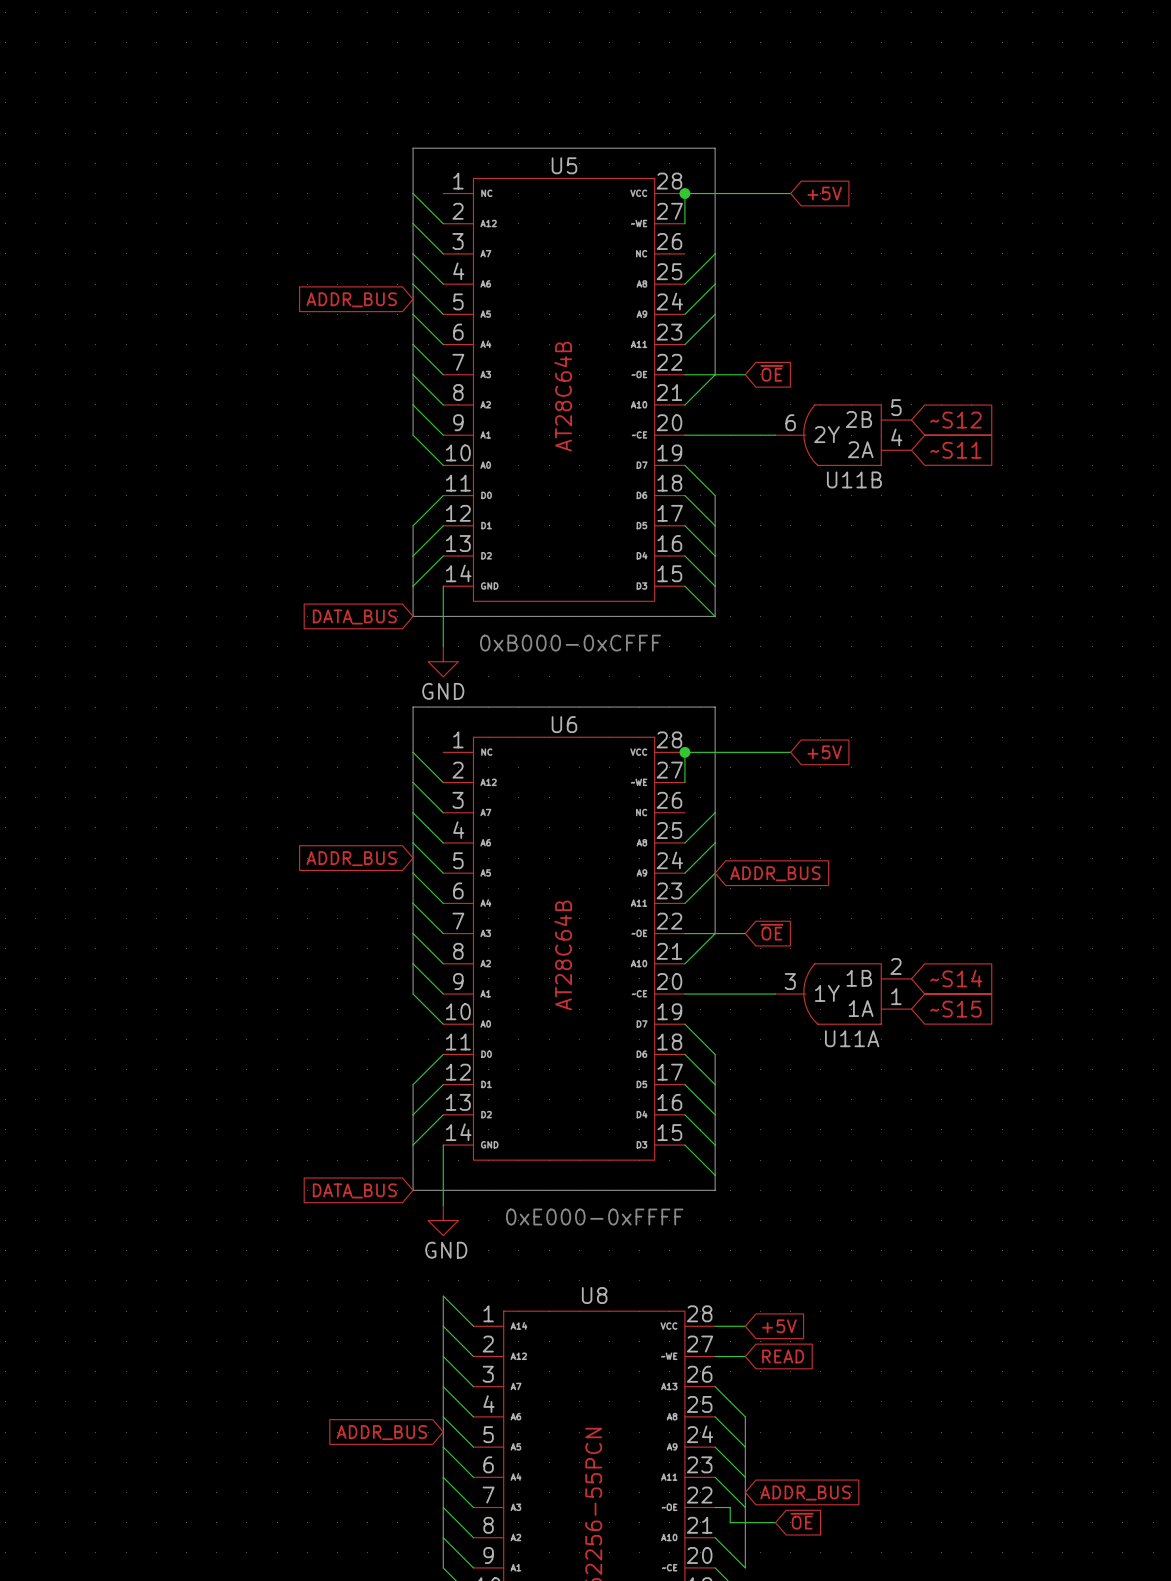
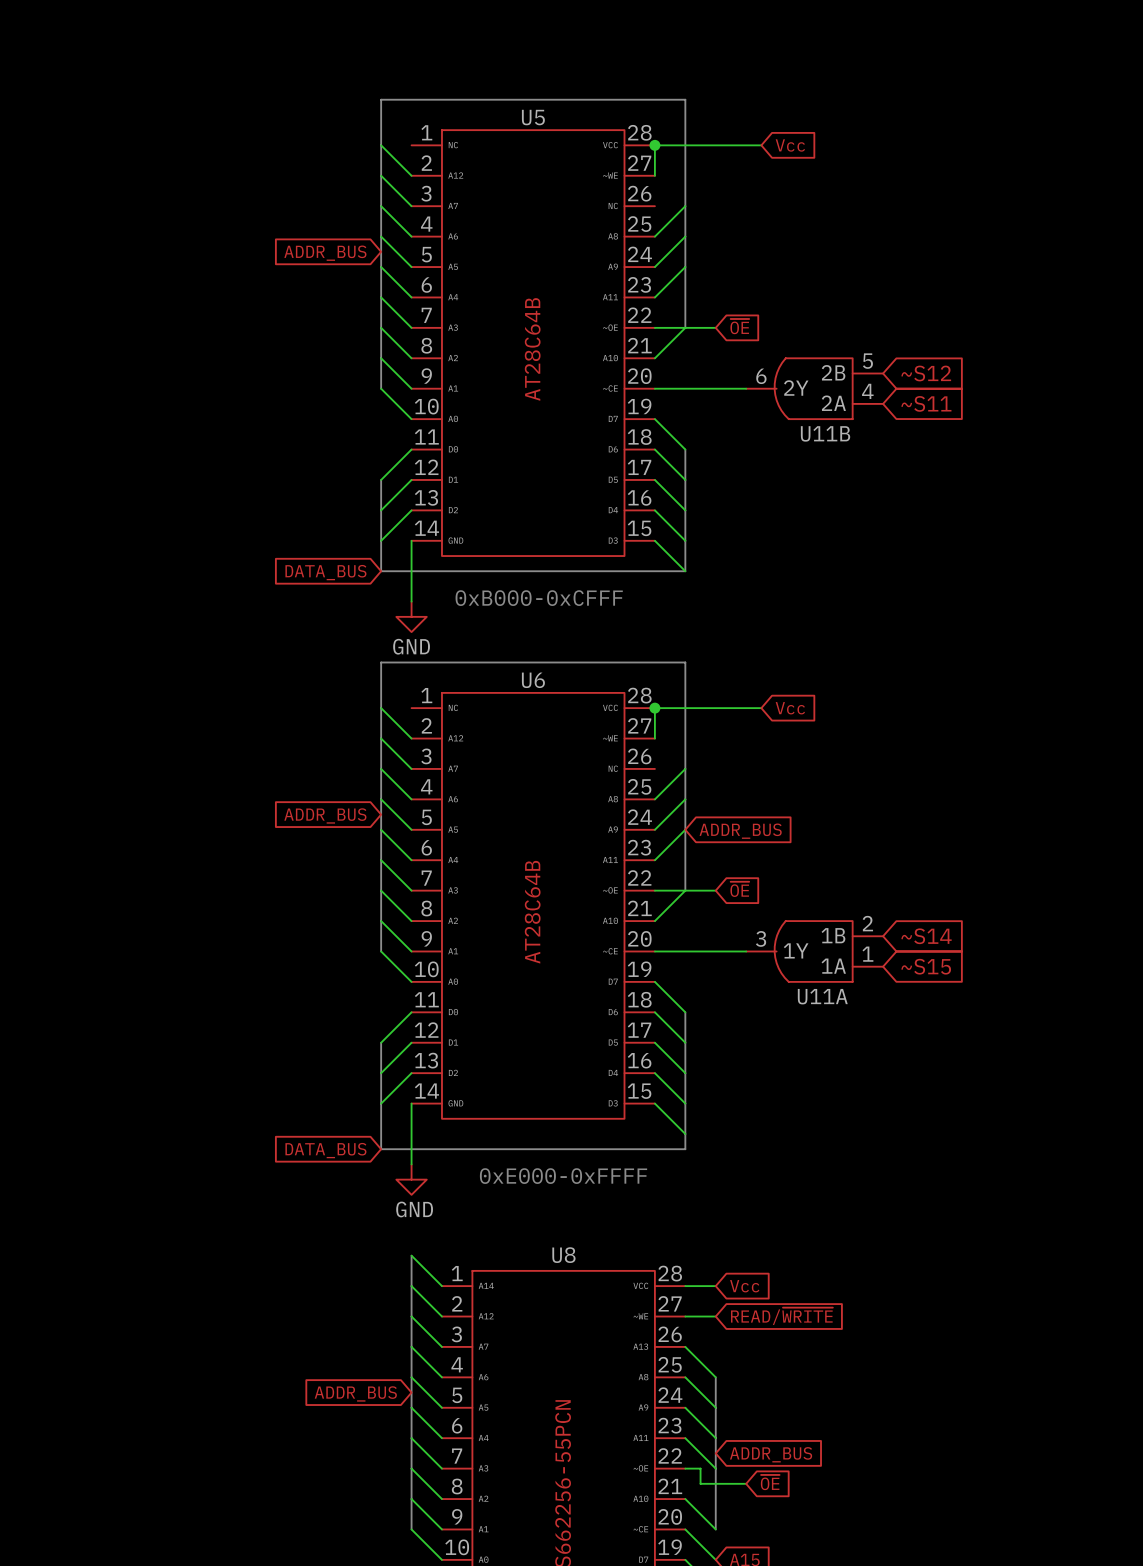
global label: +5V (824, 193) -> Vcc (790, 145)
global label: +5V (824, 752) -> Vcc (790, 708)
global label: +5V (779, 1326) -> Vcc (744, 1286)
global label: READ (783, 1356) -> READ/~{WRITE} (781, 1316)

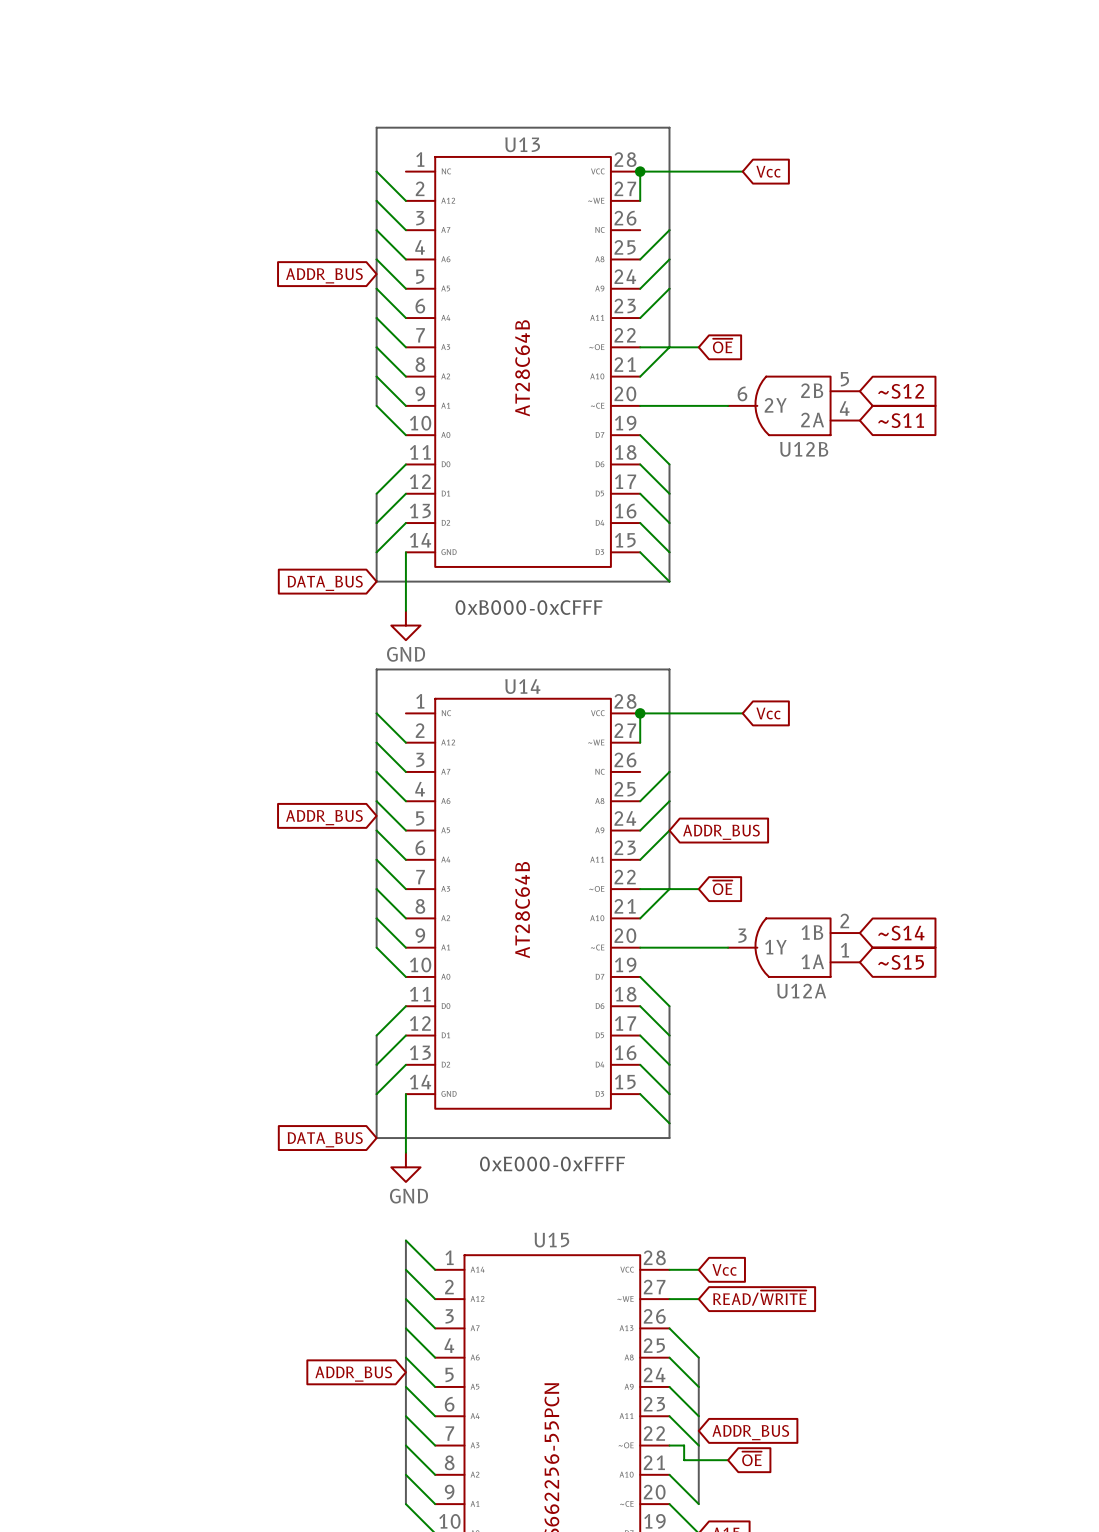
U5 name: U5 (533, 117) -> U13 (522, 144)
U11B name: U11B (825, 433) -> U12B (804, 449)
U6 name: U6 (533, 680) -> U14 (522, 686)
U11A name: U11A (822, 996) -> U12A (801, 991)
U8 name: U8 (563, 1255) -> U15 (551, 1240)

